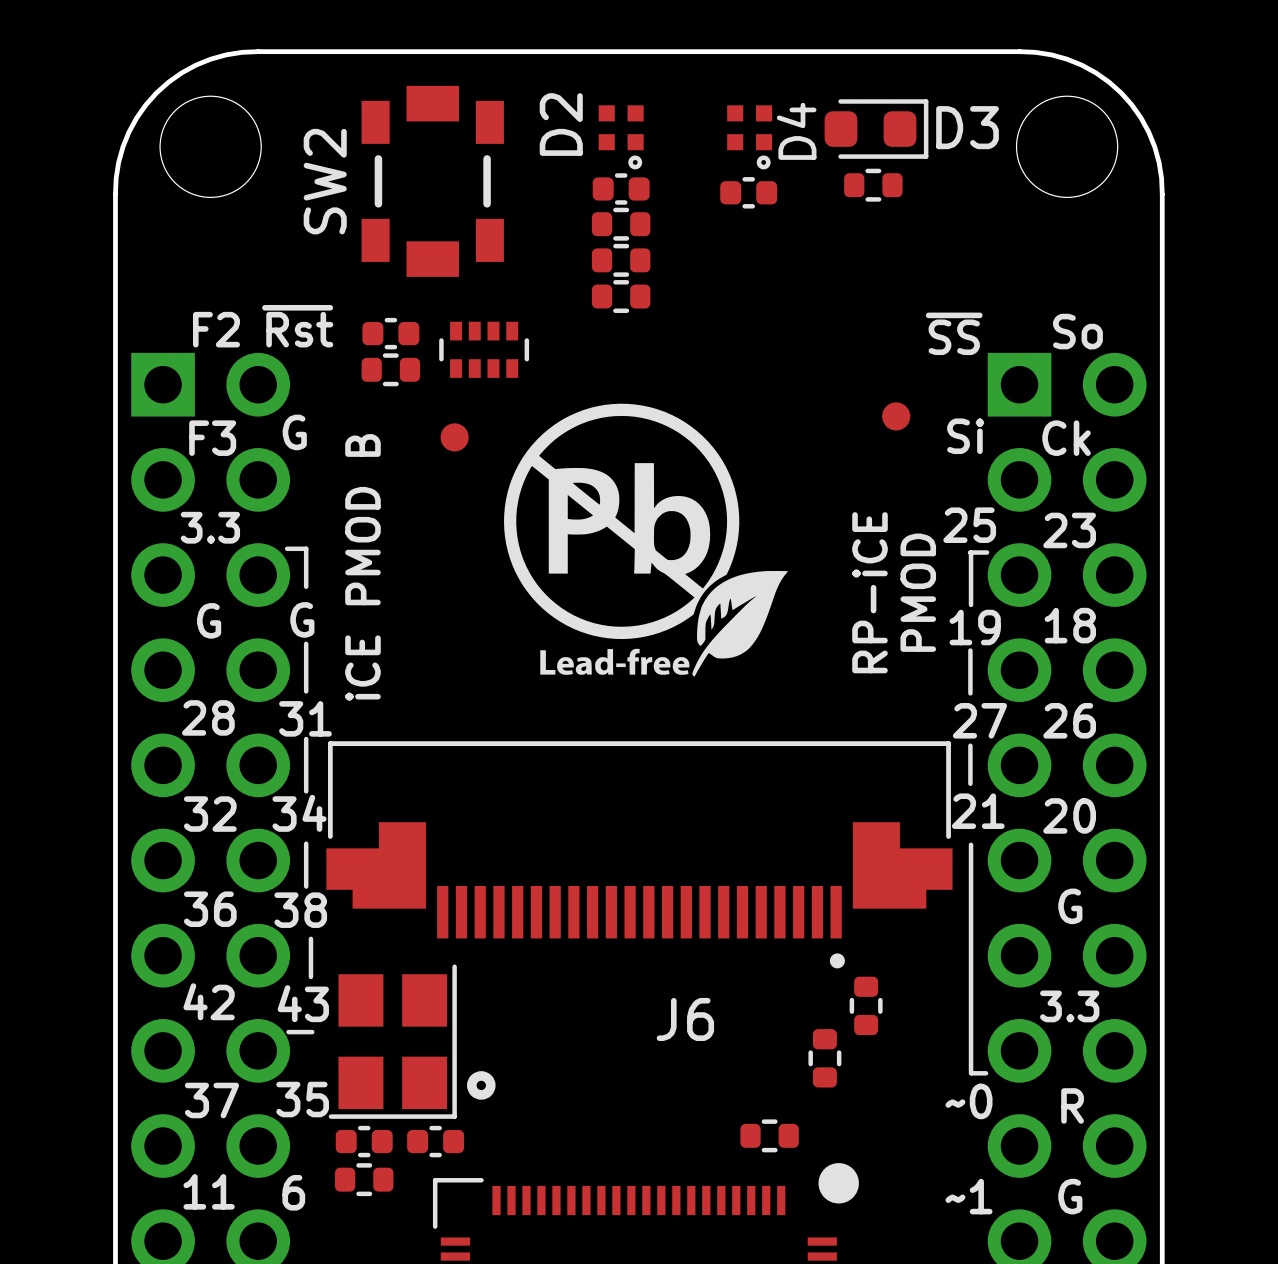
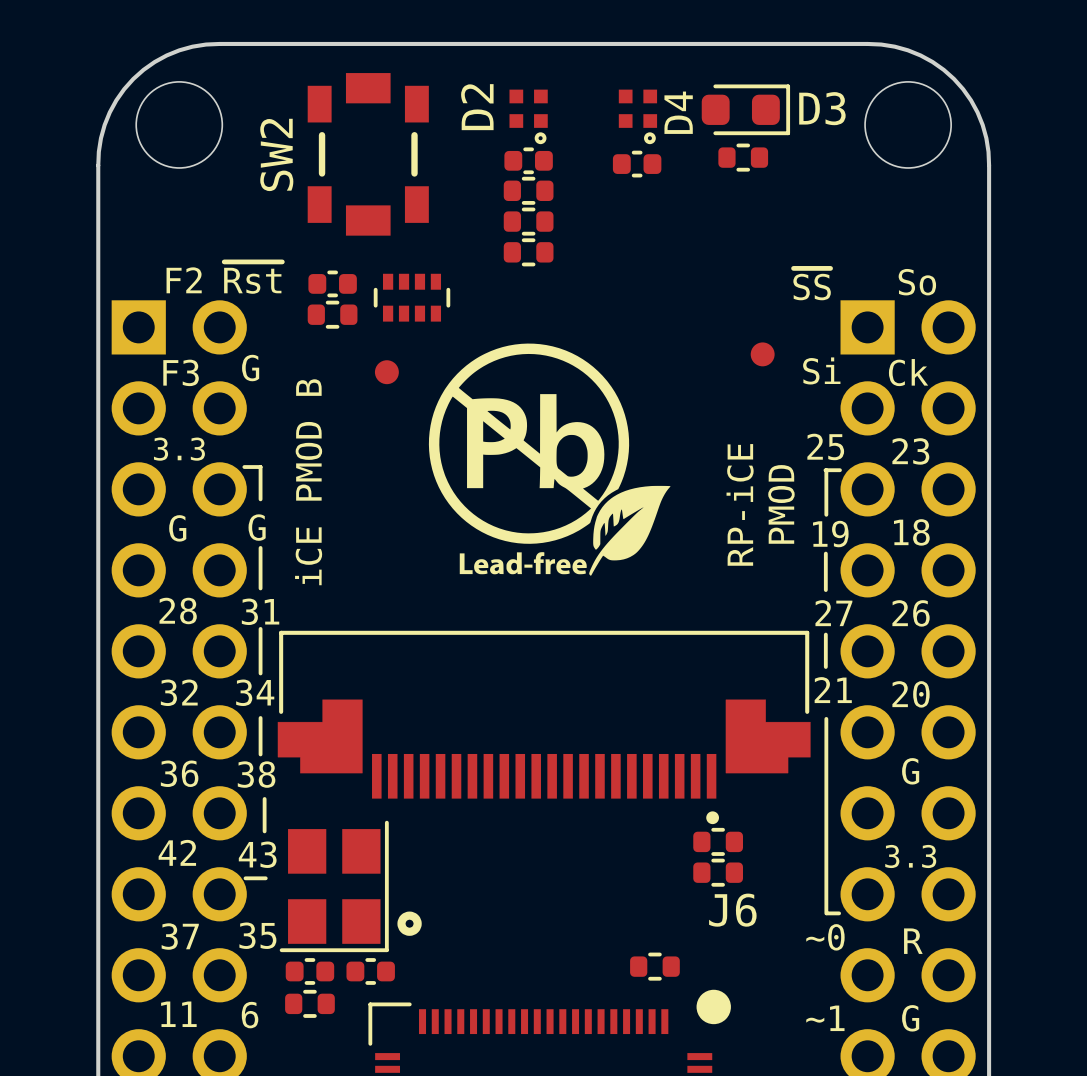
part: none -> (718, 841)
part: (866, 1005) -> none
J6 name position: J6 (685, 1019) -> J6 (732, 910)
part: none -> (718, 872)
part: (824, 1058) -> none

